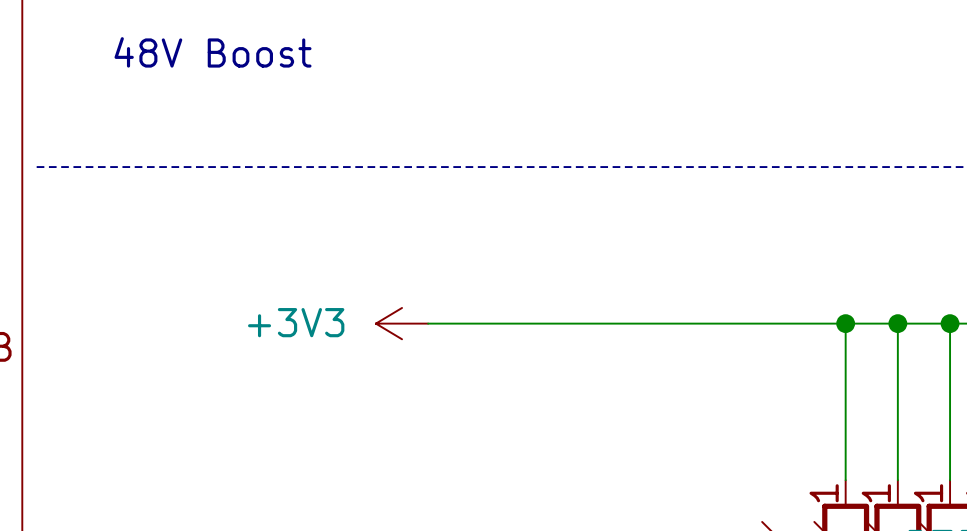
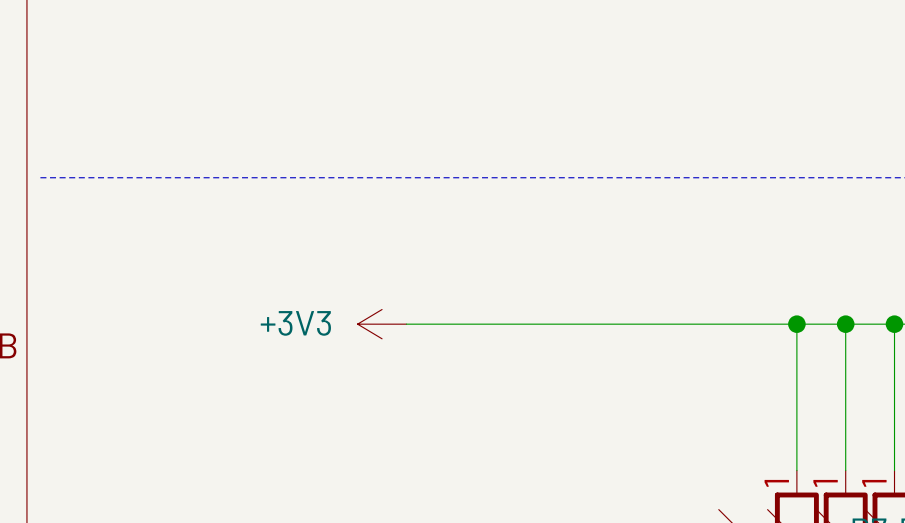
text: 48V Boost (213, 52) -> none

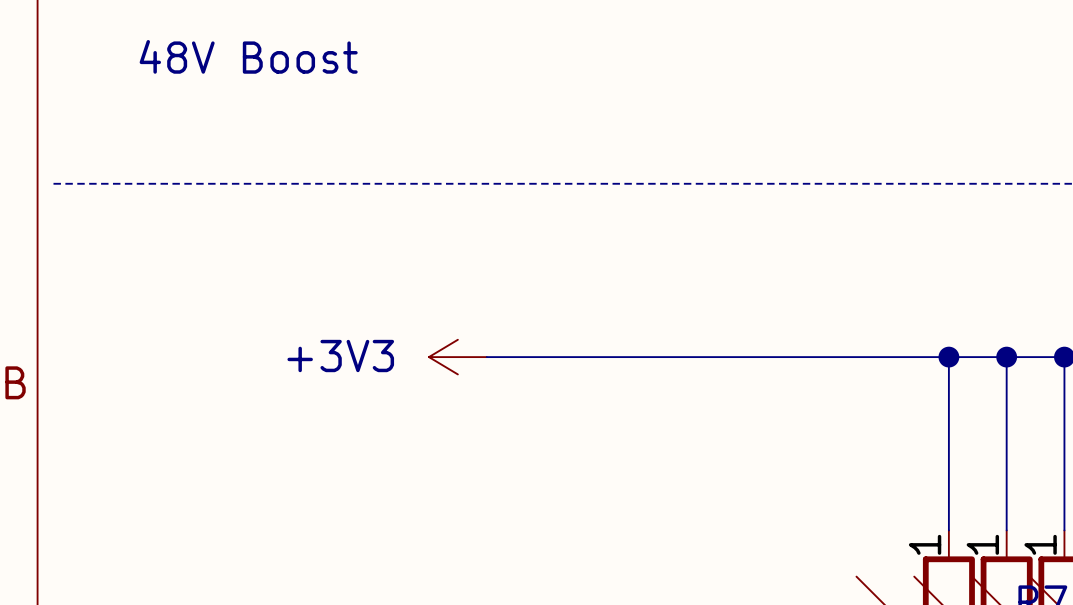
text: none -> 48V Boost (248, 56)

